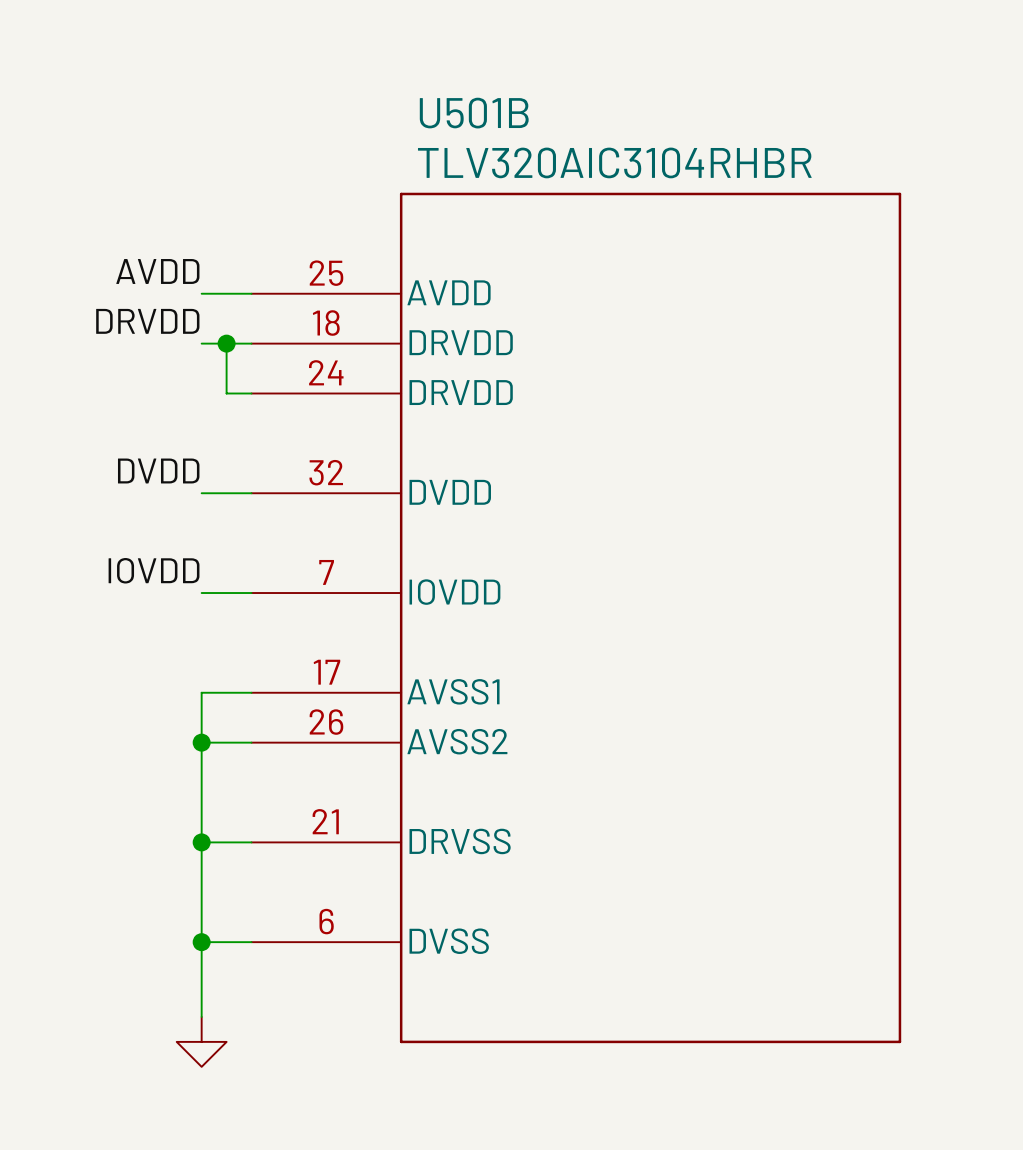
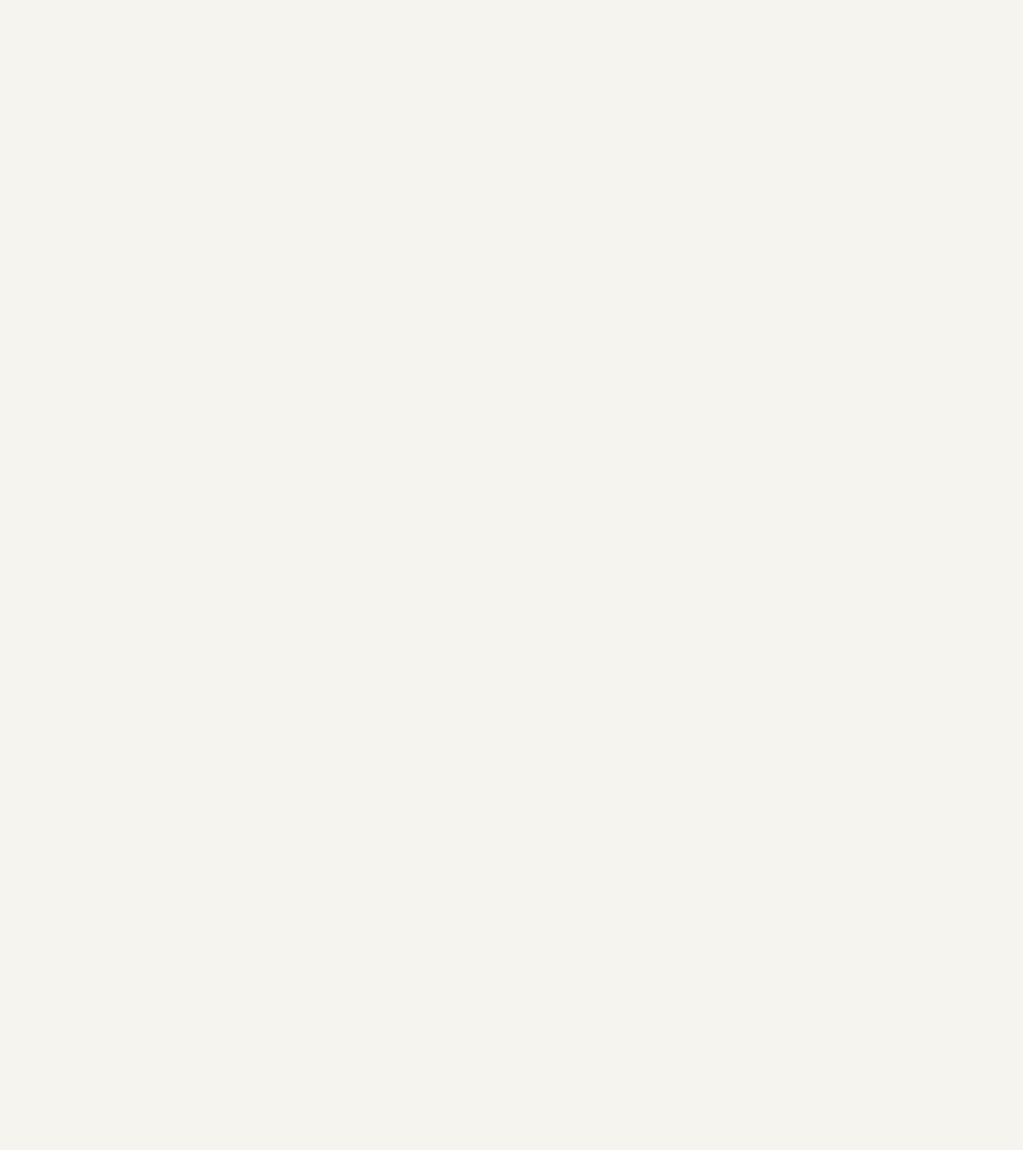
label: AVDD (157, 271) -> none
wire: (201, 293) (251, 293) -> none
label: DRVDD (147, 321) -> none
wire: (201, 343) (251, 343) -> none
wire: (226, 343) (226, 393) (251, 393) -> none
junction: (226, 343) -> none
label: DVDD (158, 471) -> none
wire: (201, 493) (251, 493) -> none
label: IOVDD (154, 570) -> none
wire: (201, 593) (251, 593) -> none
U501B: TLV320AIC3104RHBR (576, 617) -> none
wire: (251, 692) (201, 692) (201, 1016) -> none
wire: (201, 742) (251, 742) -> none
junction: (201, 742) -> none
wire: (201, 842) (251, 842) -> none
junction: (201, 842) -> none
wire: (201, 942) (251, 942) -> none
junction: (201, 942) -> none
power symbol: (201, 1041) -> none

